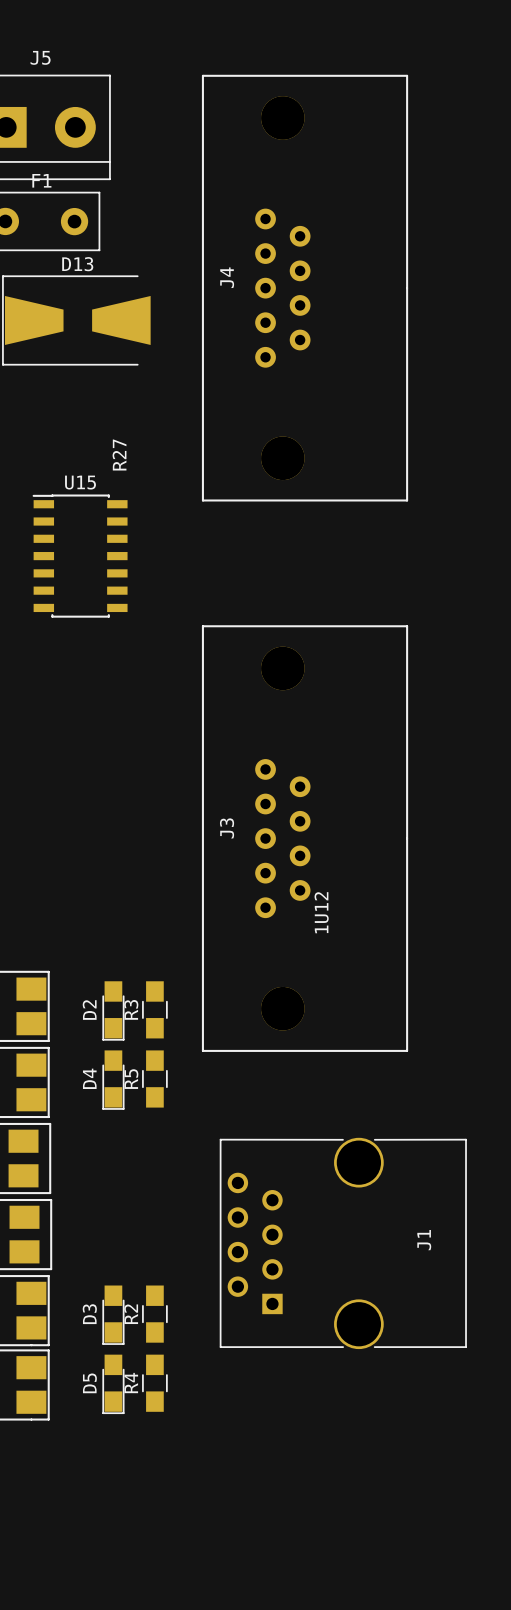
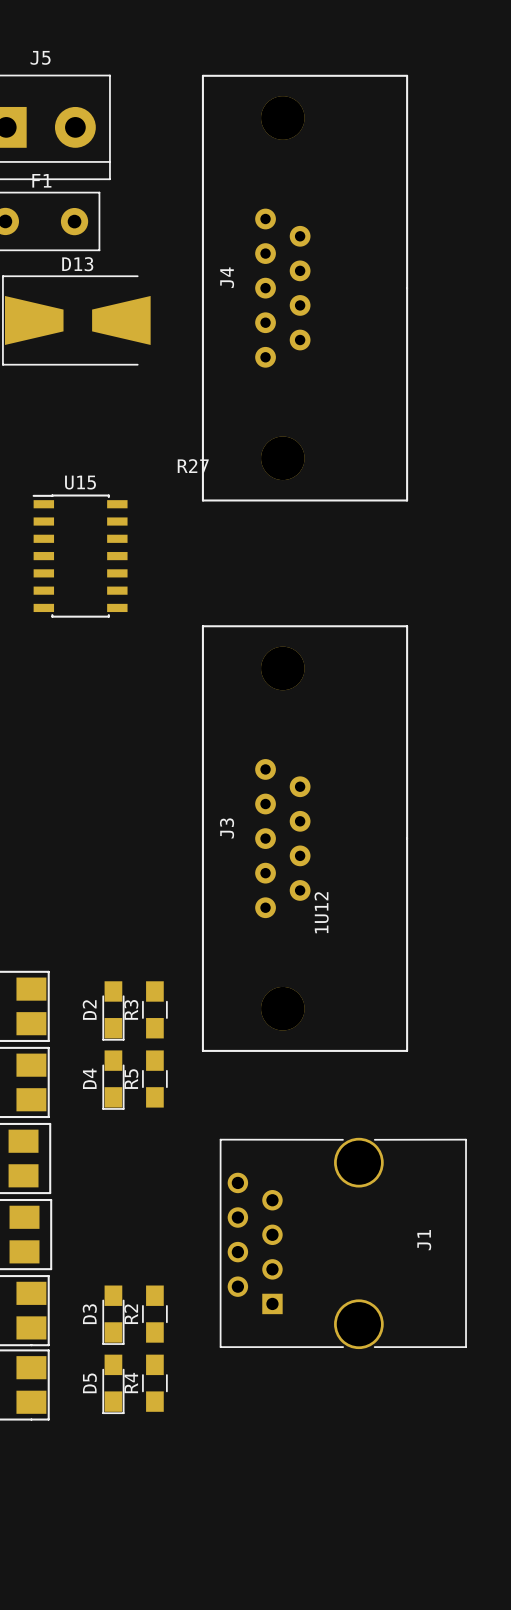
R27 position: (119, 455) -> (193, 466)
R27 name rotation: 0° (119, 455) -> 90° clockwise (193, 466)

